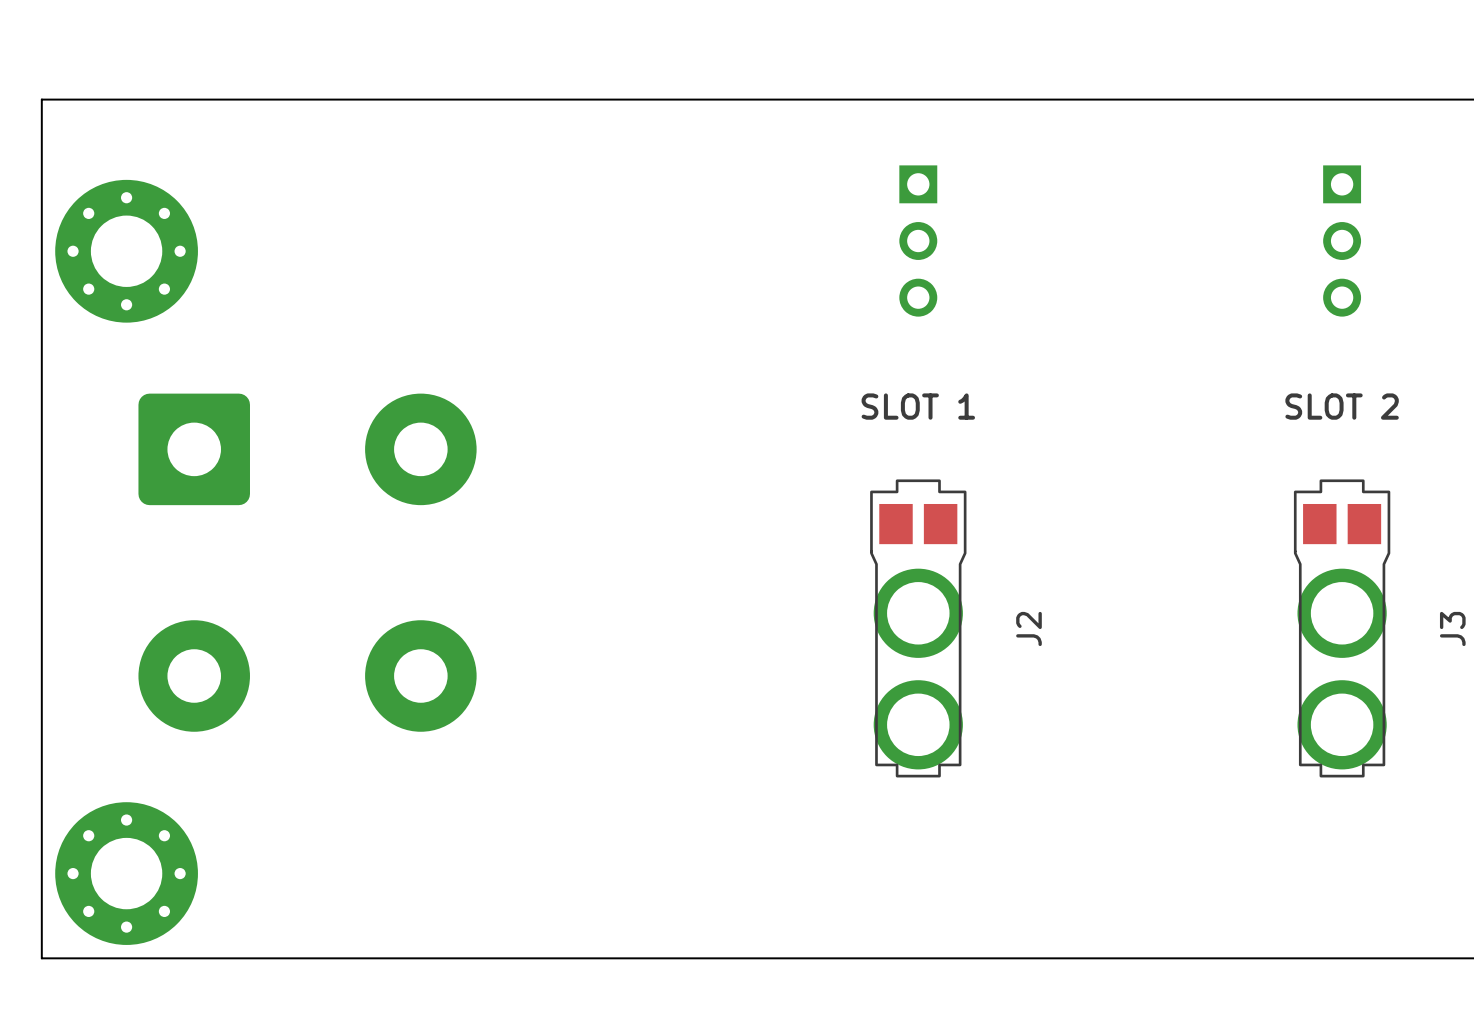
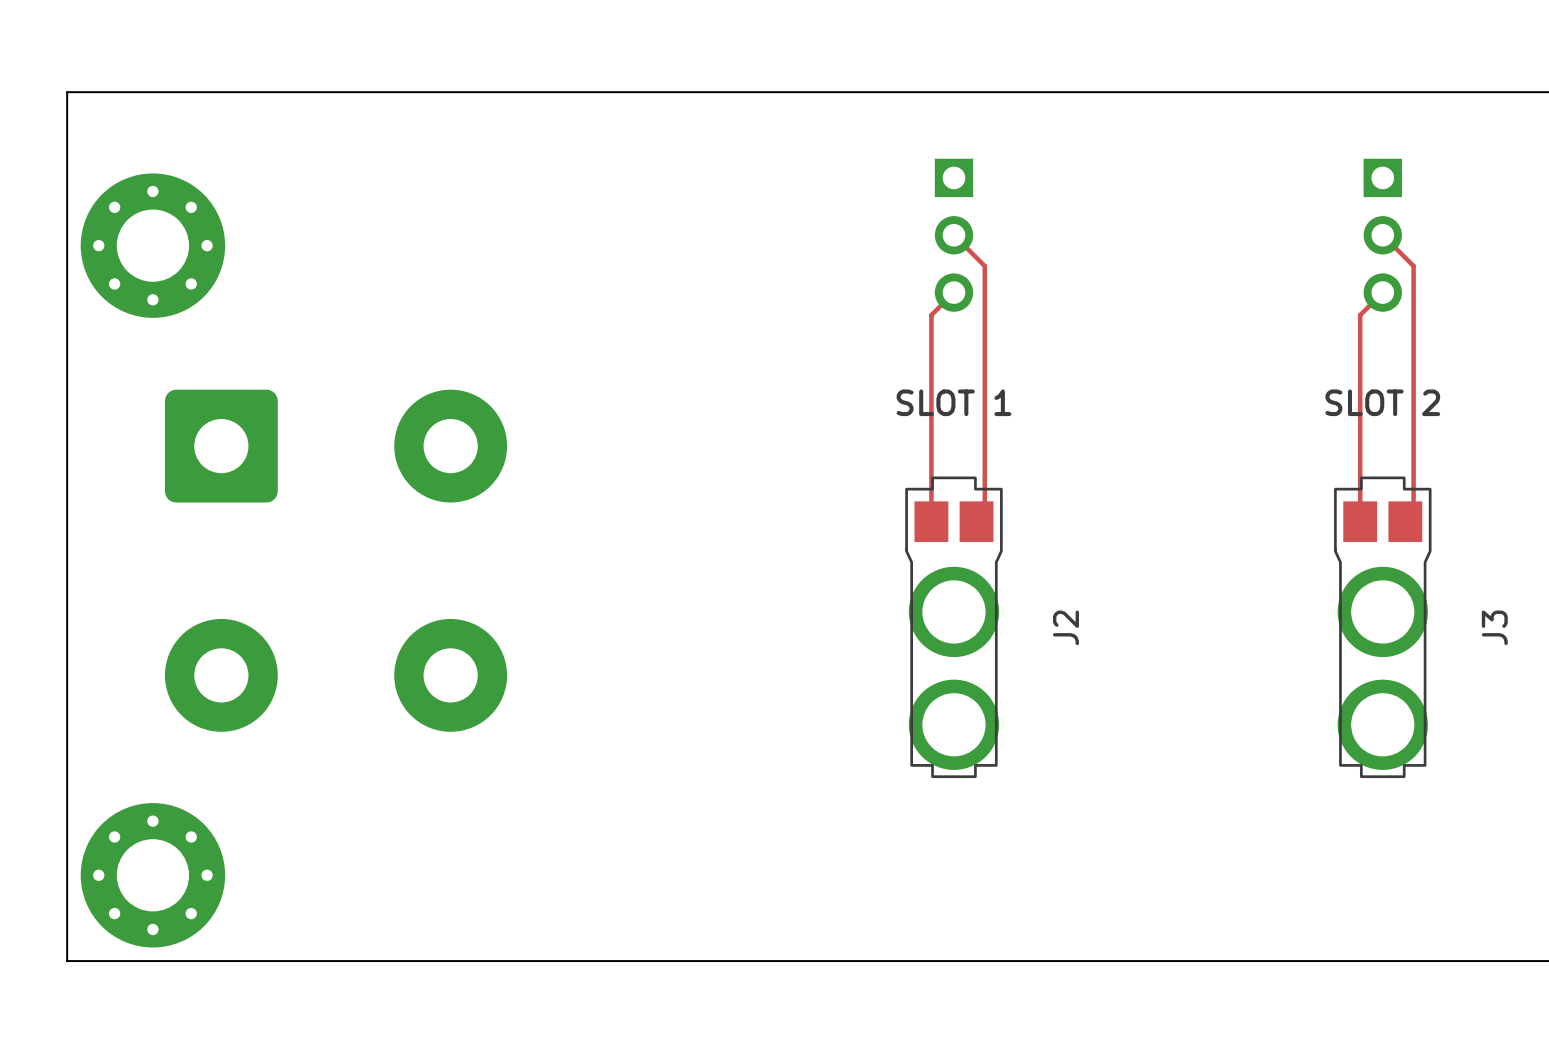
top track: none -> (953, 235) (984, 266) (984, 513) (976, 521)
top track: none -> (1382, 235) (1413, 266) (1413, 513) (1405, 521)
top track: none -> (953, 292) (931, 315) (931, 521)
top track: none -> (1382, 292) (1360, 315) (1360, 521)

